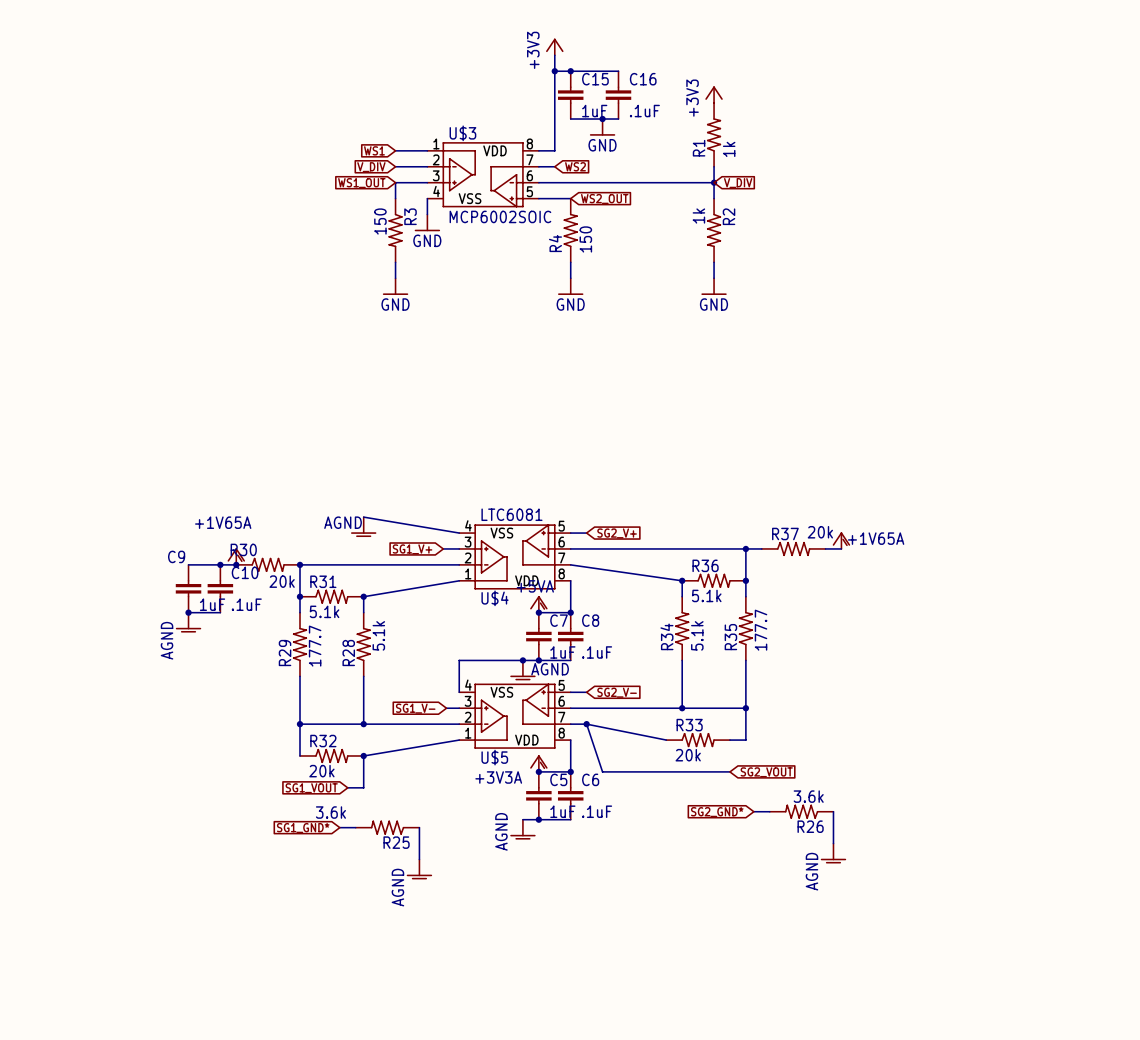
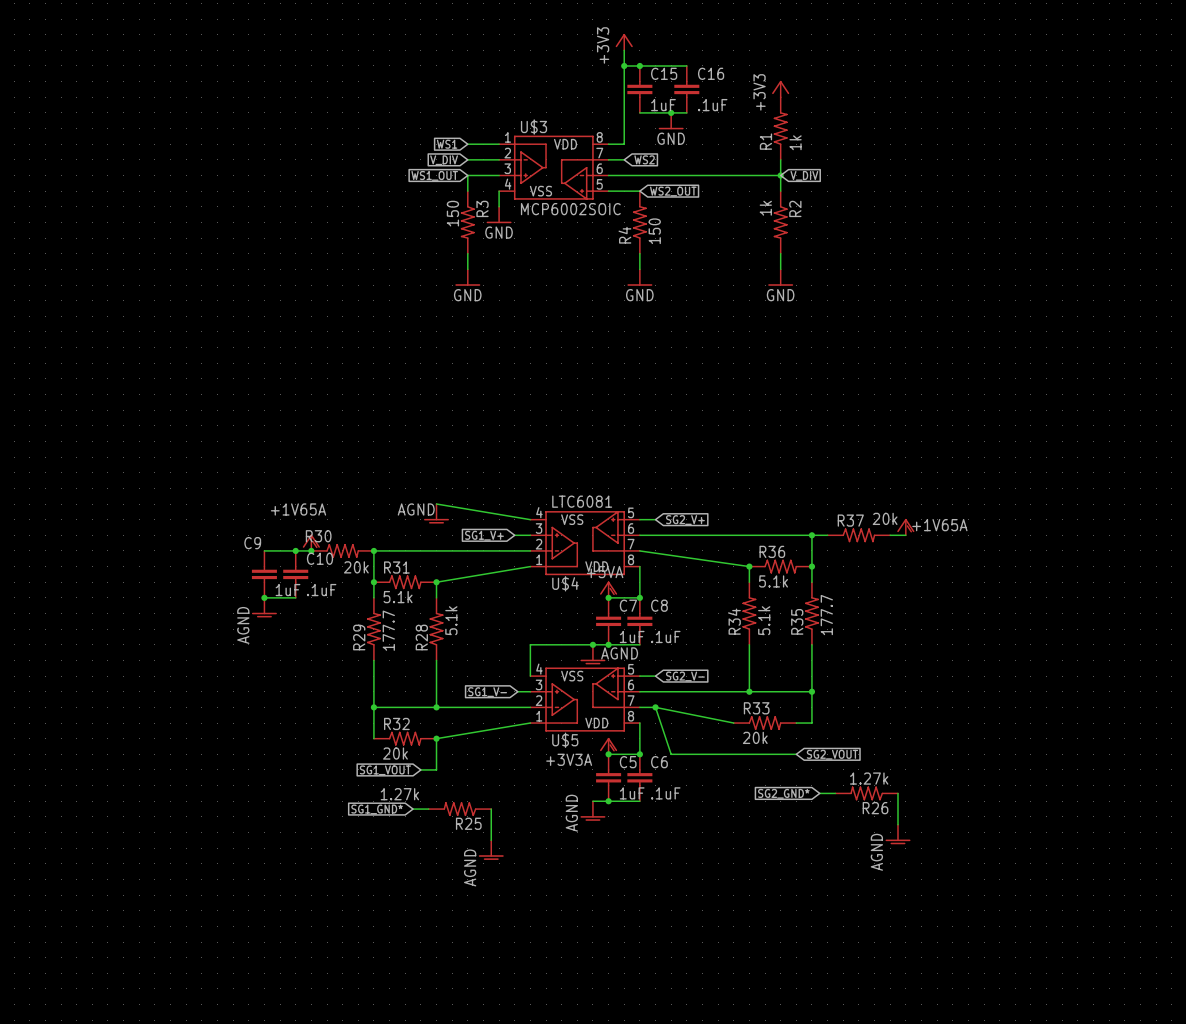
R26 value: 3.6k (808, 796) -> 1.27k (869, 778)
R25 value: 3.6k (330, 812) -> 1.27k (399, 794)

